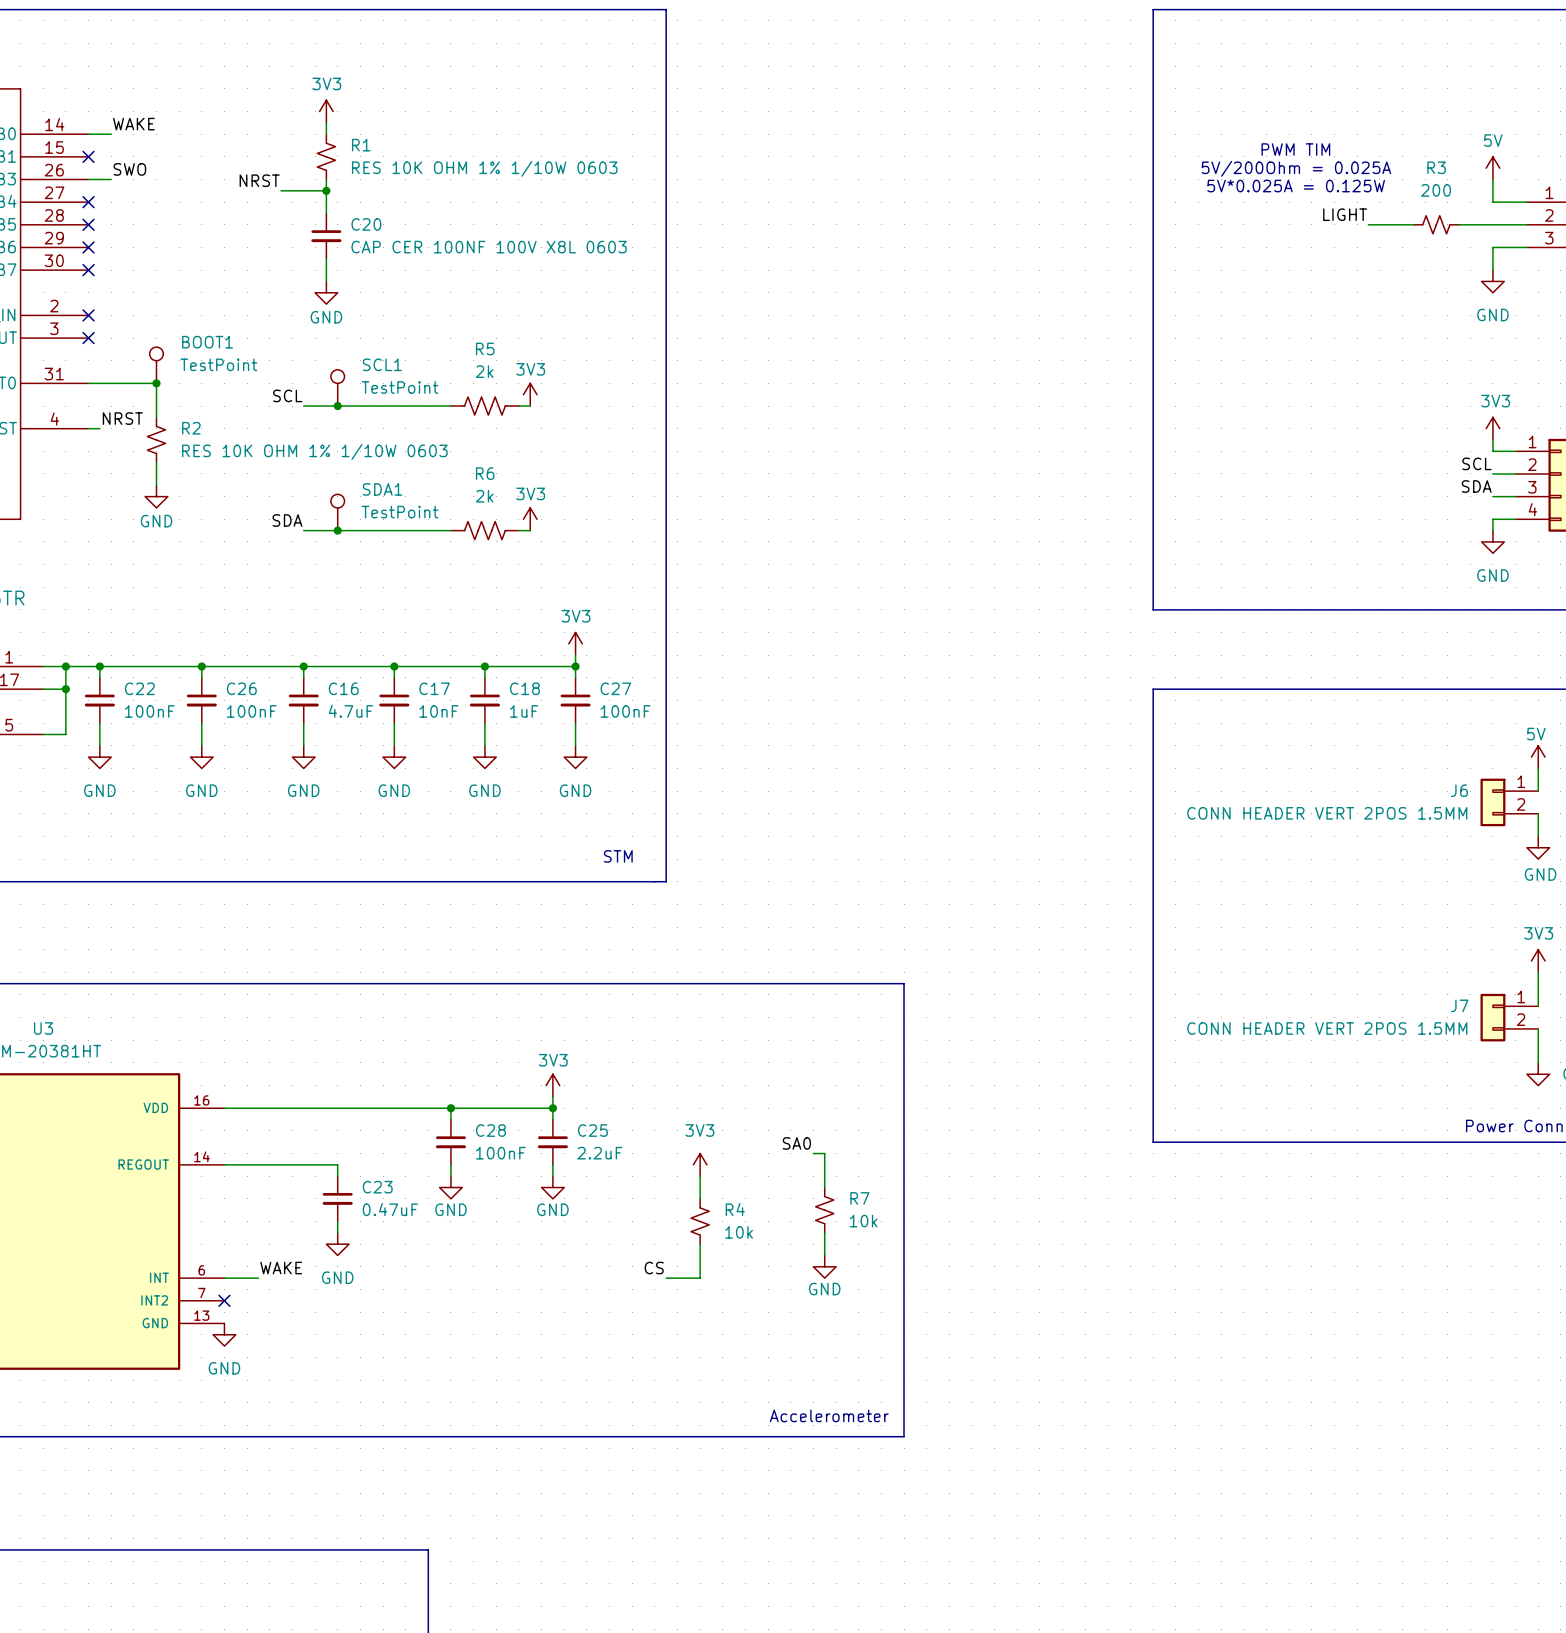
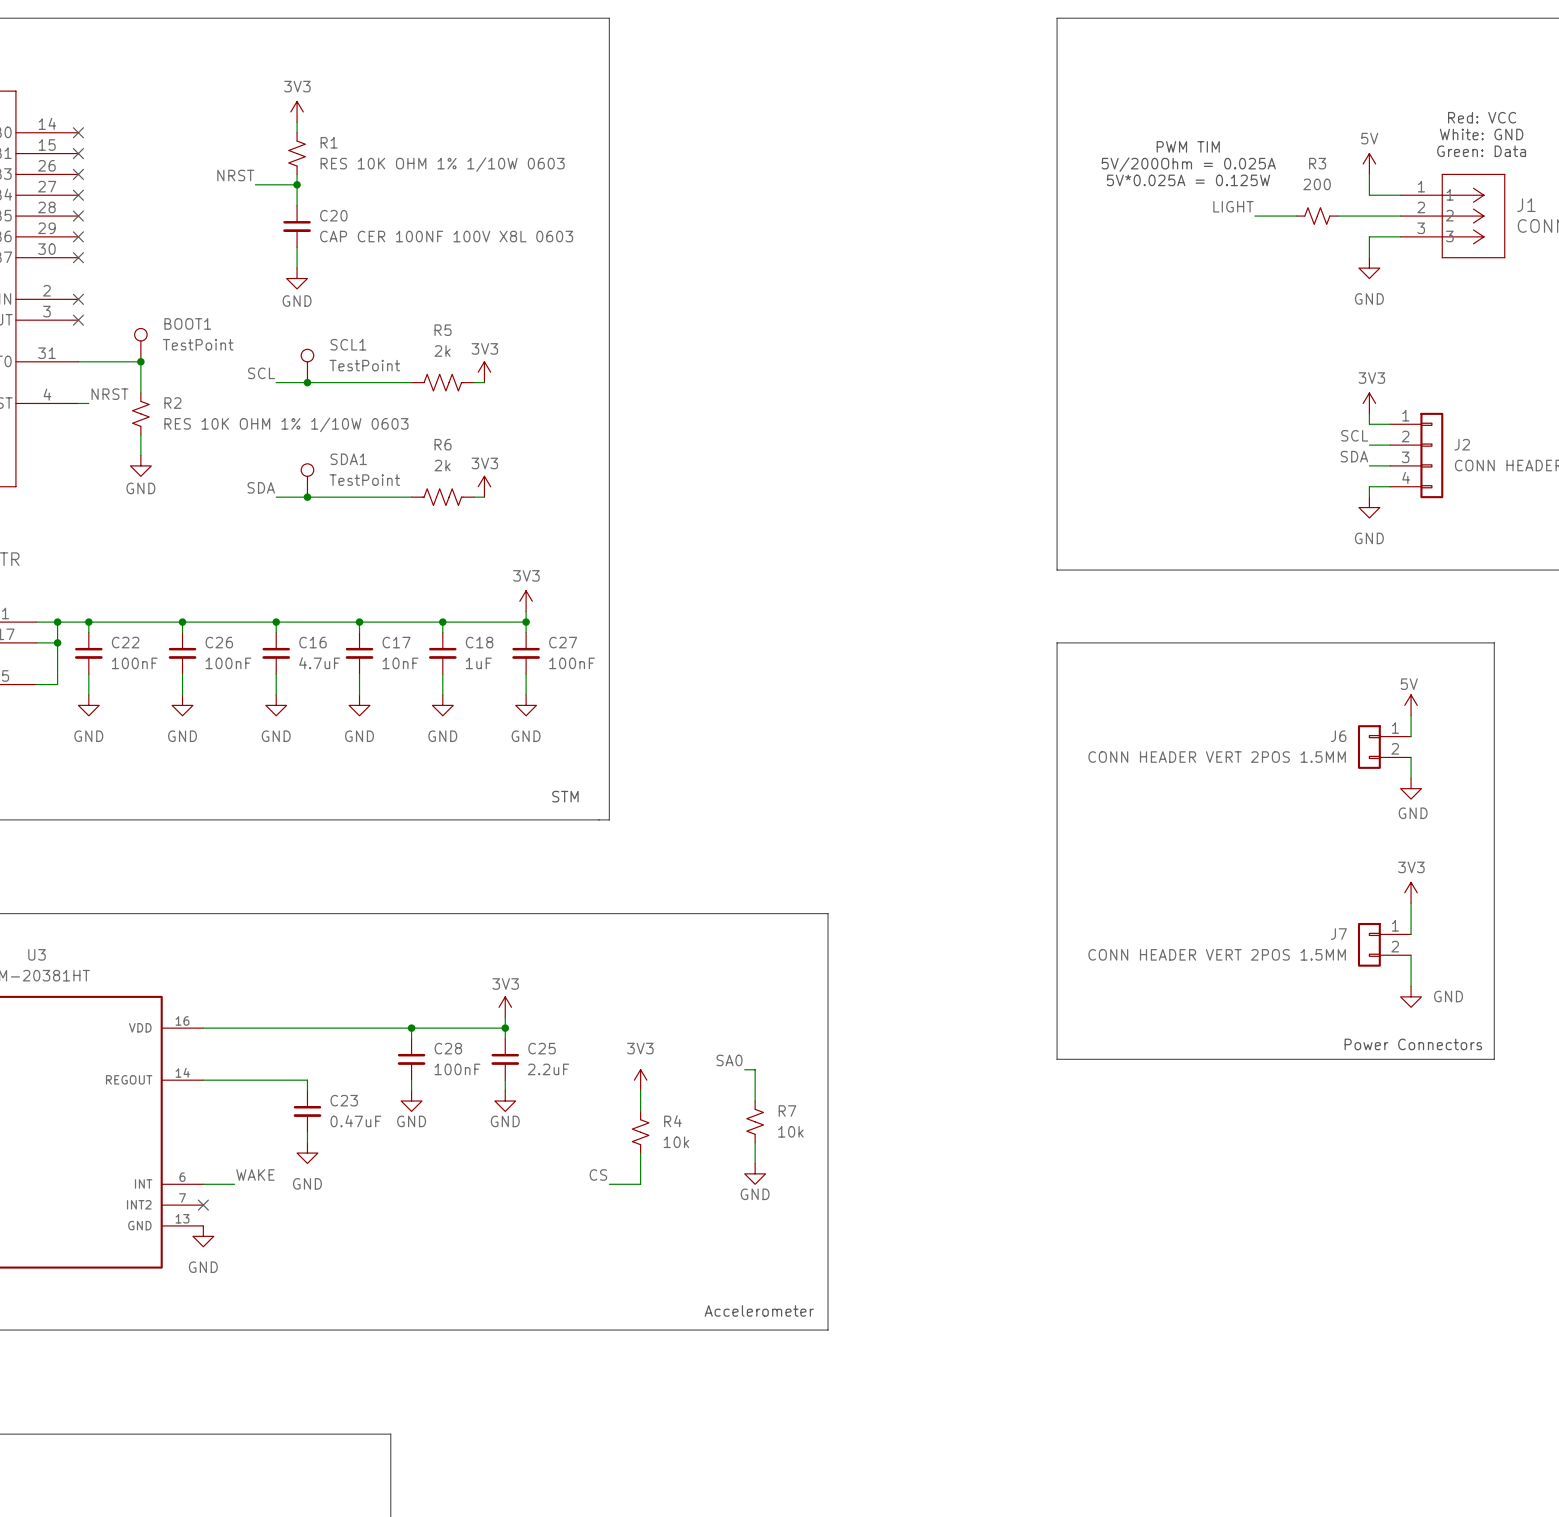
label: WAKE (133, 124) -> none
wire: (88, 134) (111, 134) -> none
no-connect mark: none -> (78, 132)
label: SWO (129, 169) -> none
wire: (88, 179) (111, 179) -> none
no-connect mark: none -> (78, 174)

